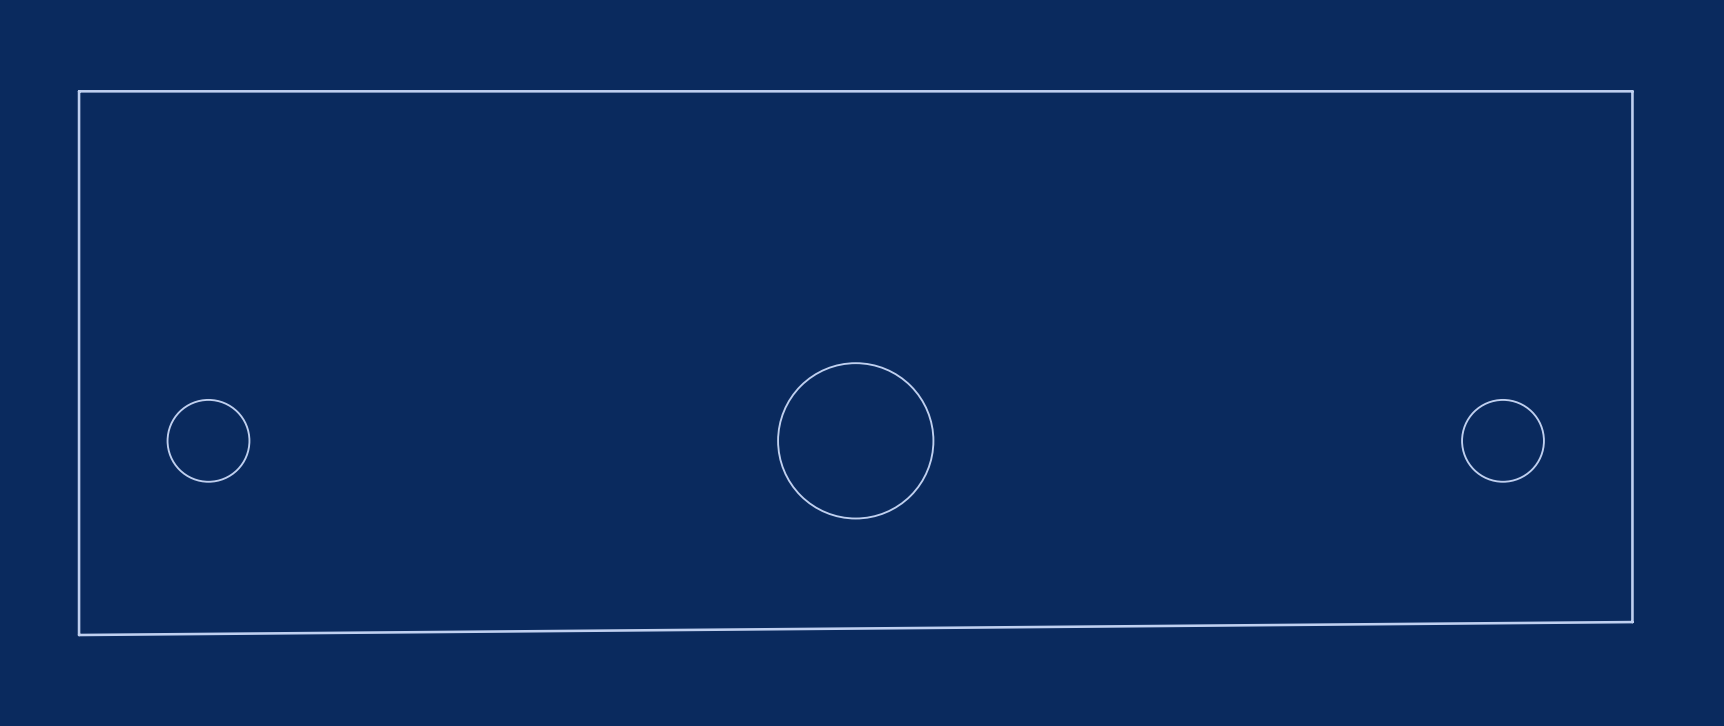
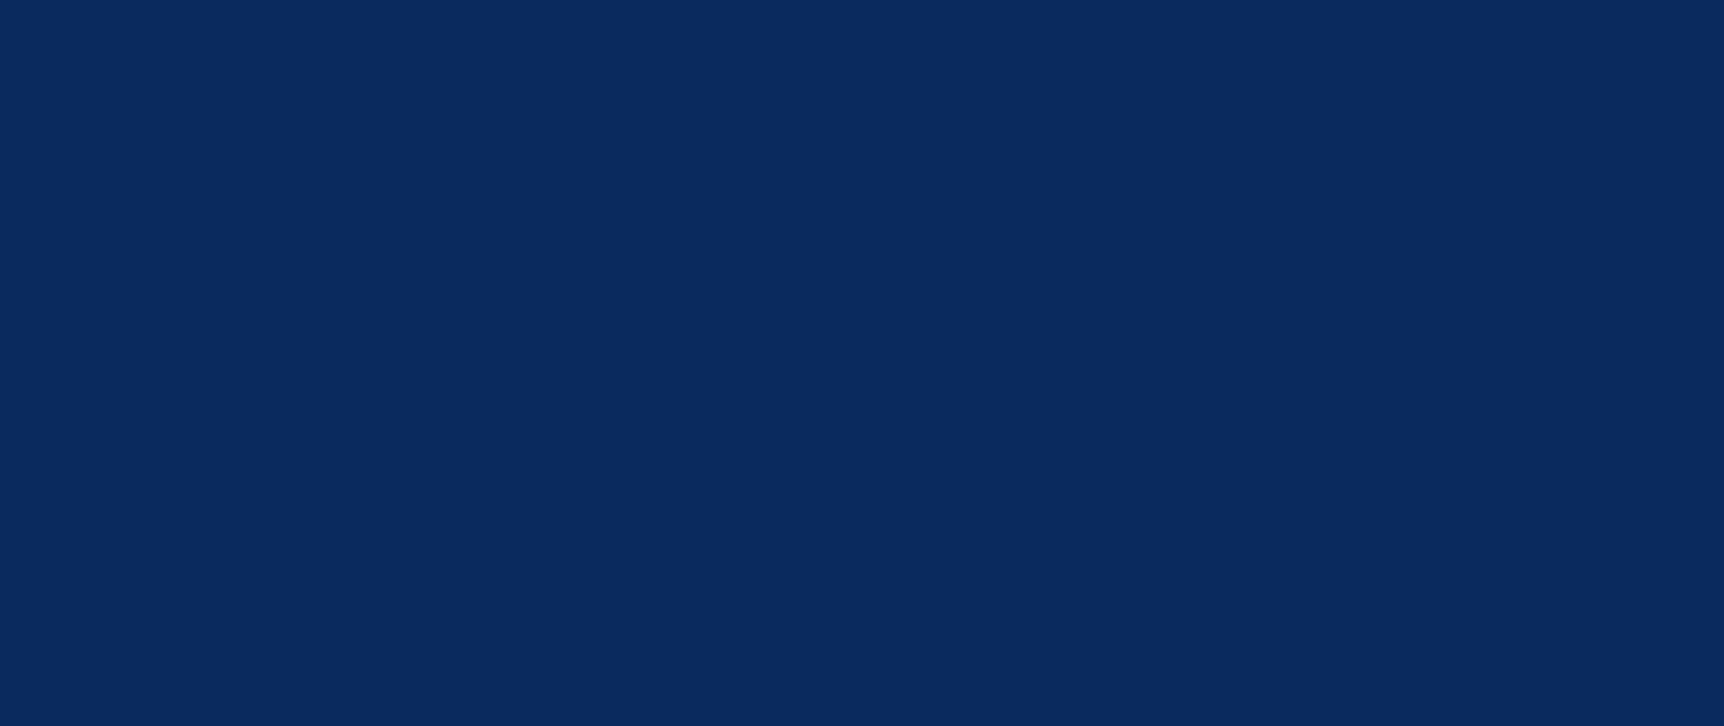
board edge: (1632, 91) (79, 91) (79, 635) (1632, 622) (1632, 91) -> none
round board edge: [777, 362, 935, 520] -> none
round board edge: [166, 399, 251, 483] -> none
round board edge: [1461, 399, 1545, 483] -> none

